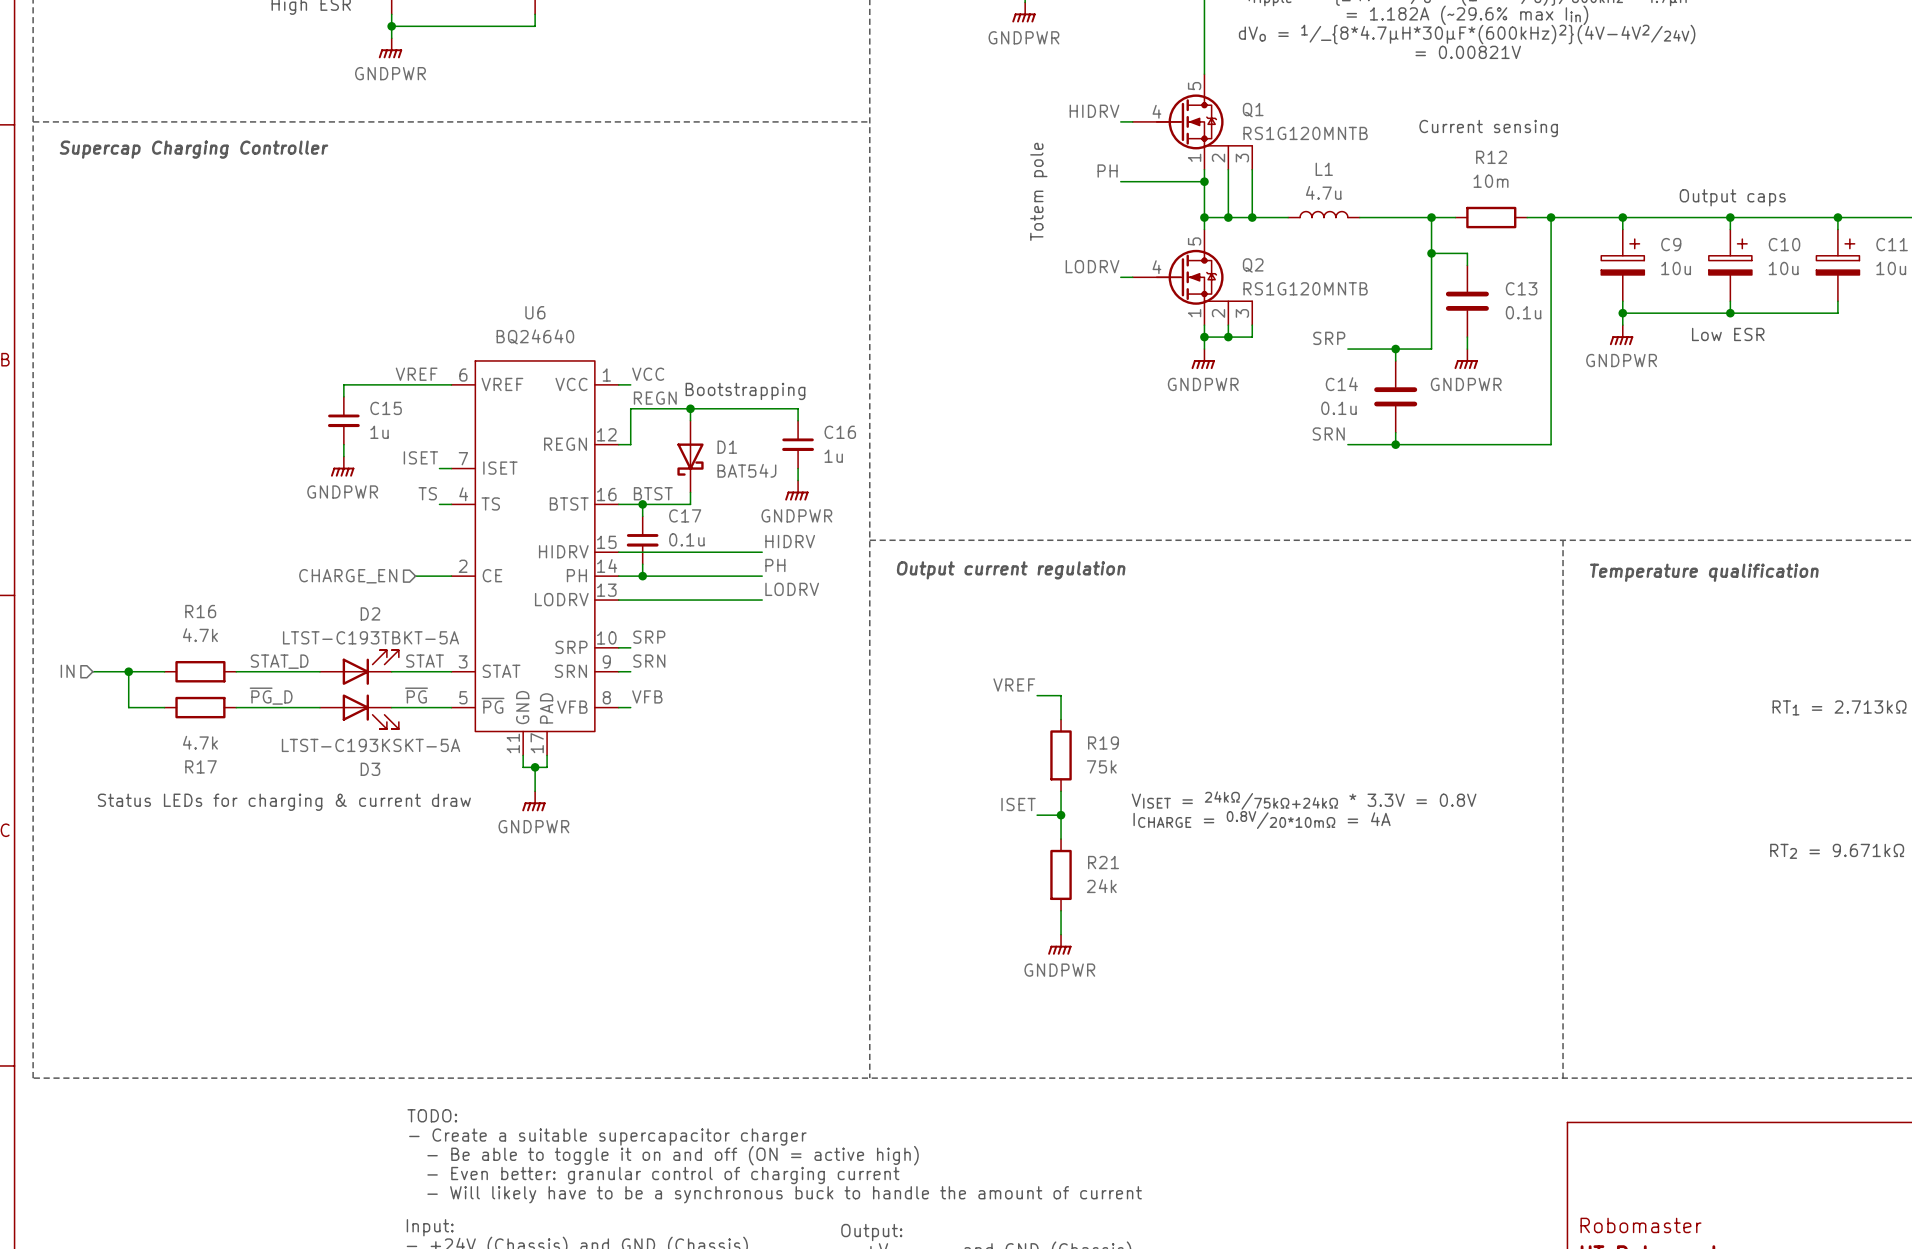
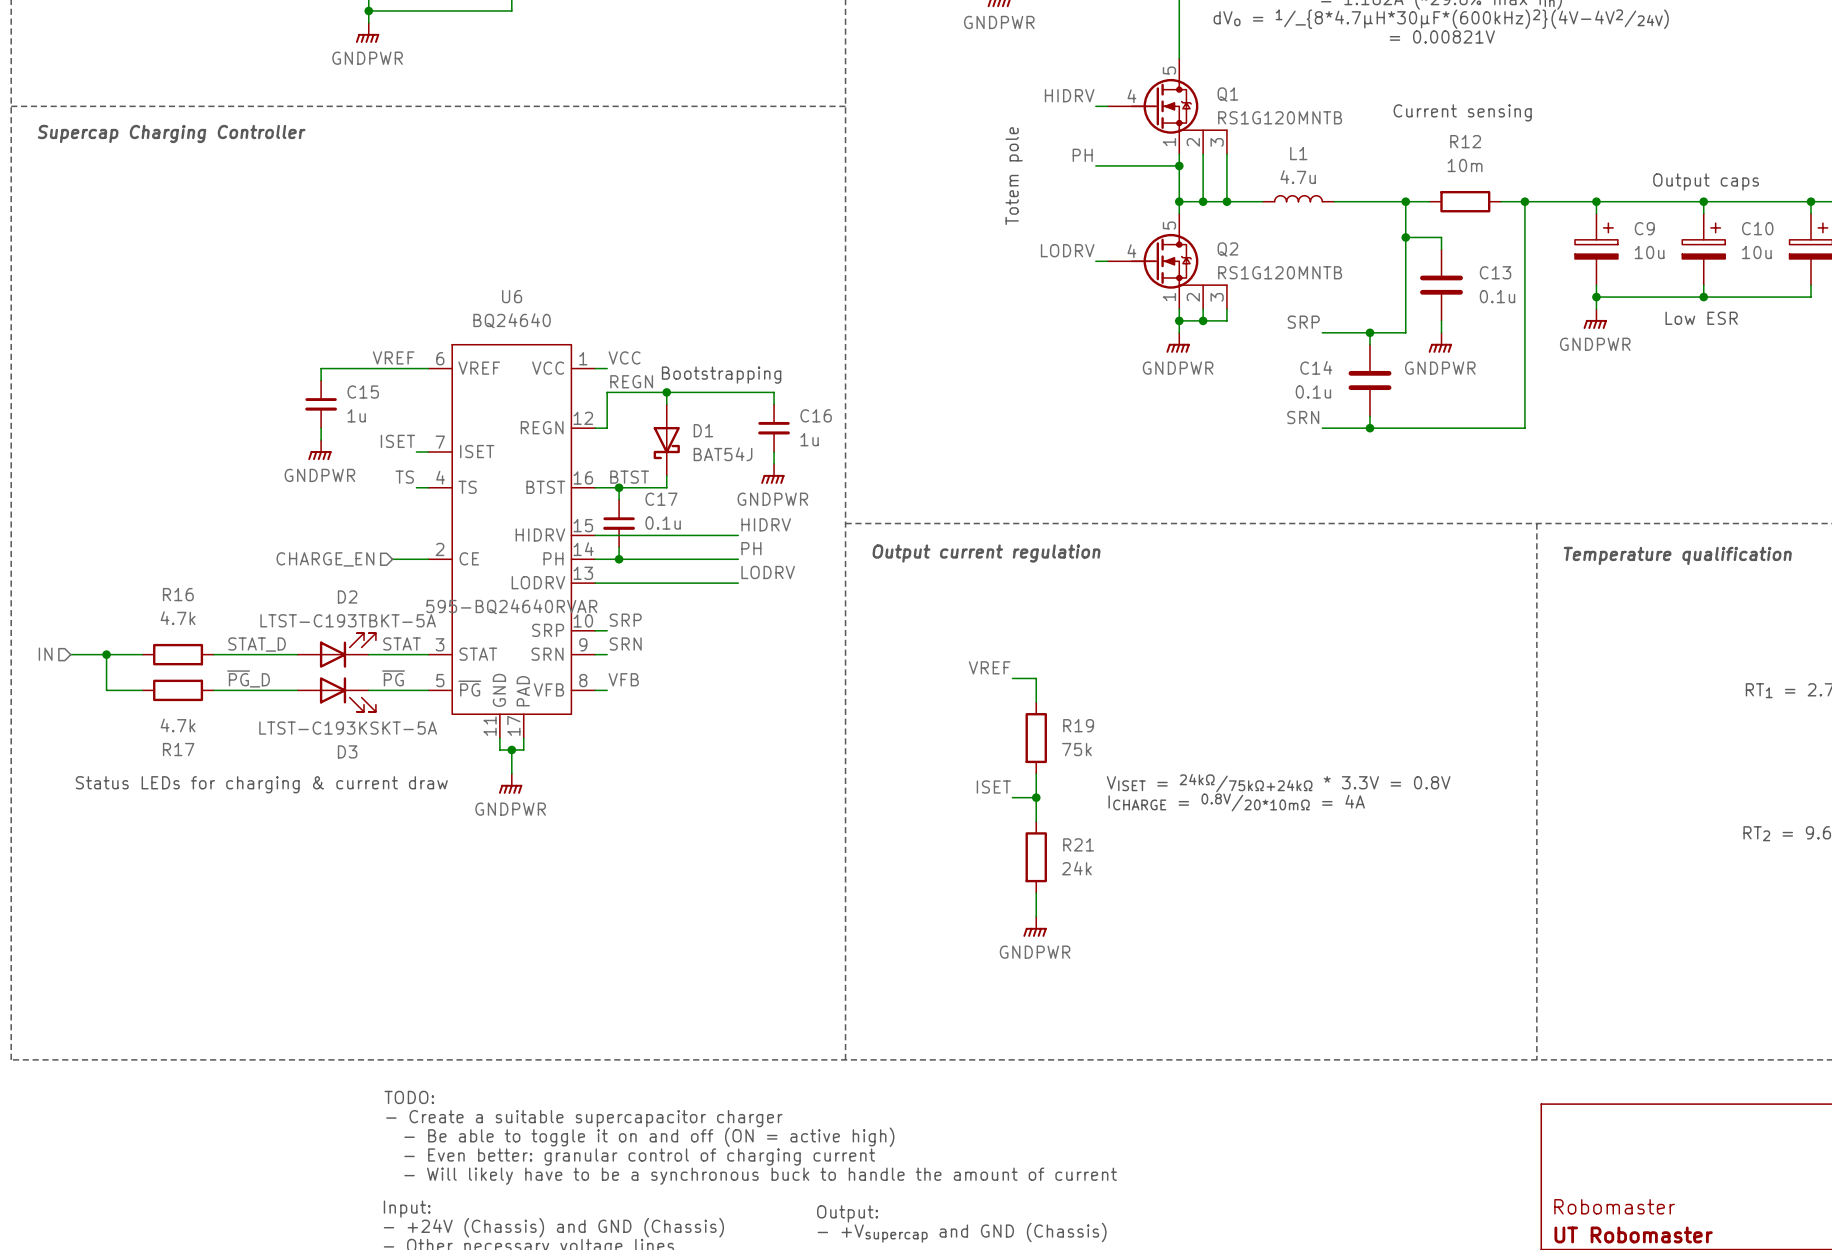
U6 text: none -> 595-BQ24640RVAR (511, 606)

